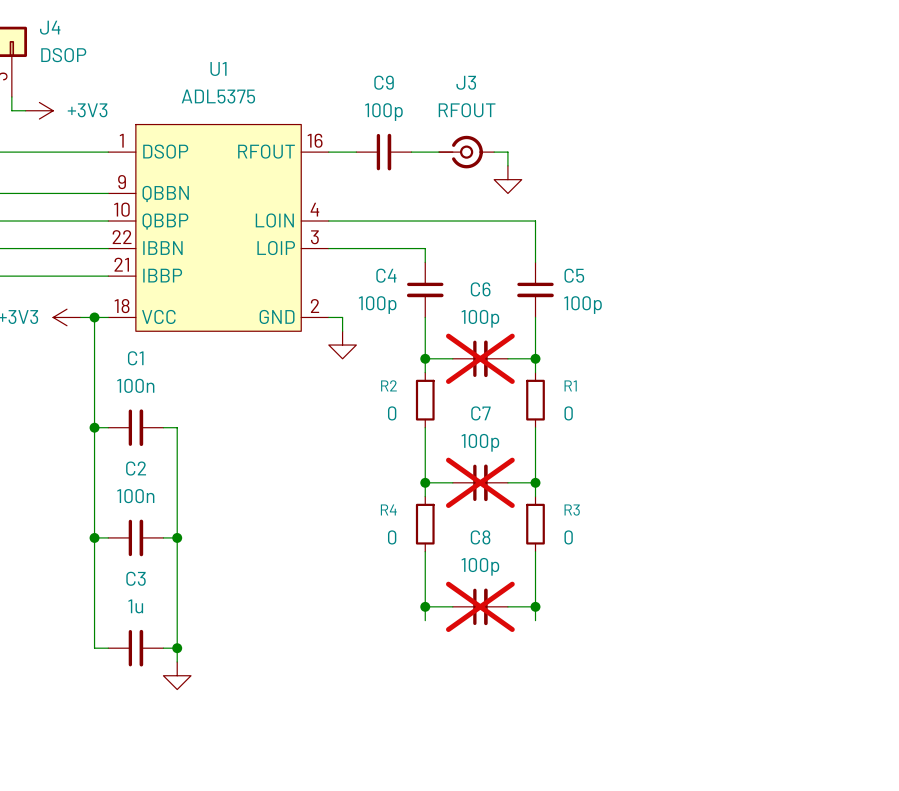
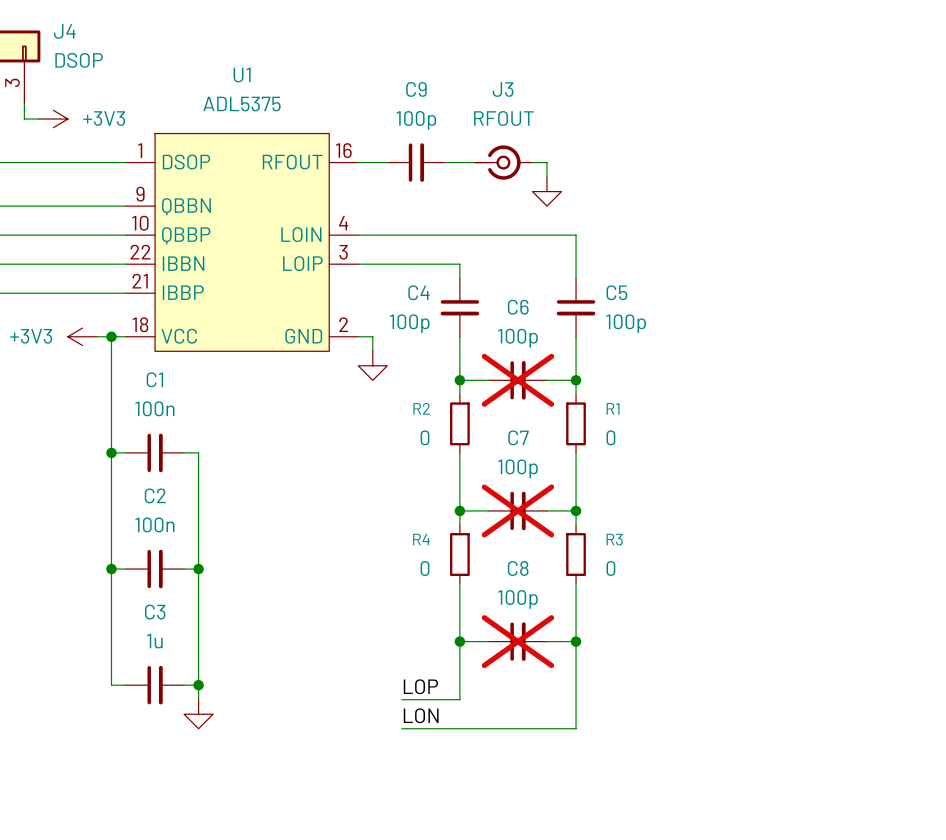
wire: none -> (459, 656) (459, 699) (401, 699)
wire: none -> (576, 656) (576, 728) (401, 728)
label: none -> LOP (420, 686)
label: none -> LON (421, 715)

